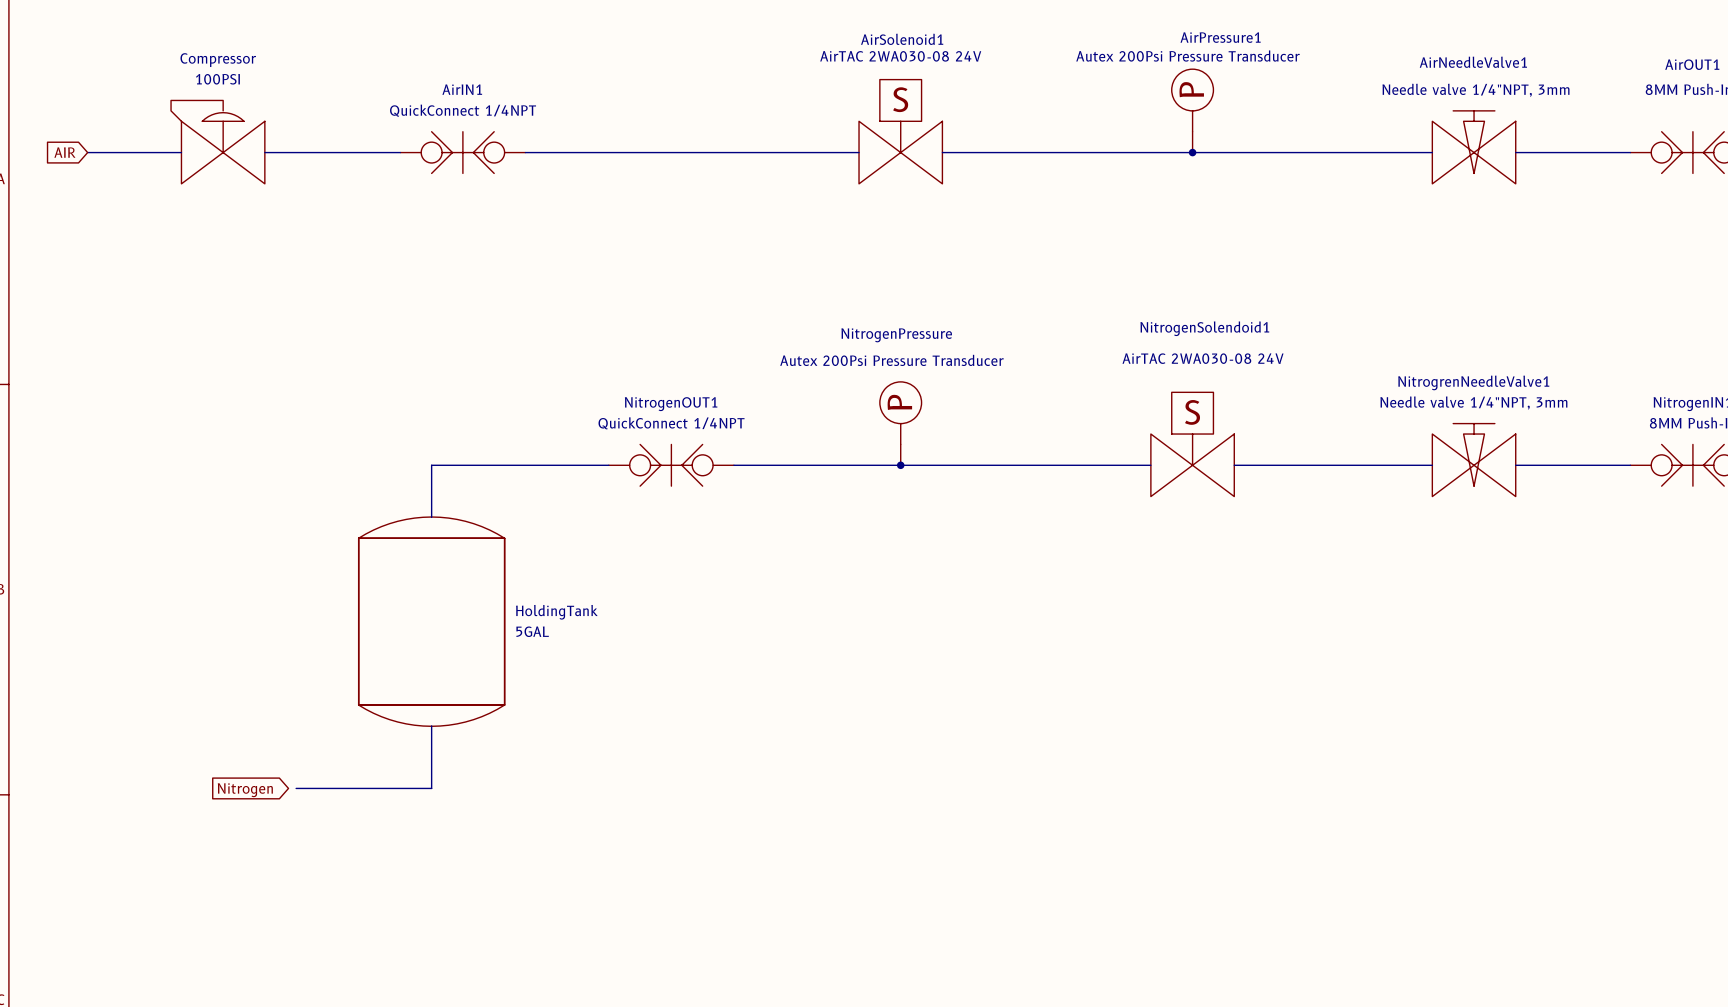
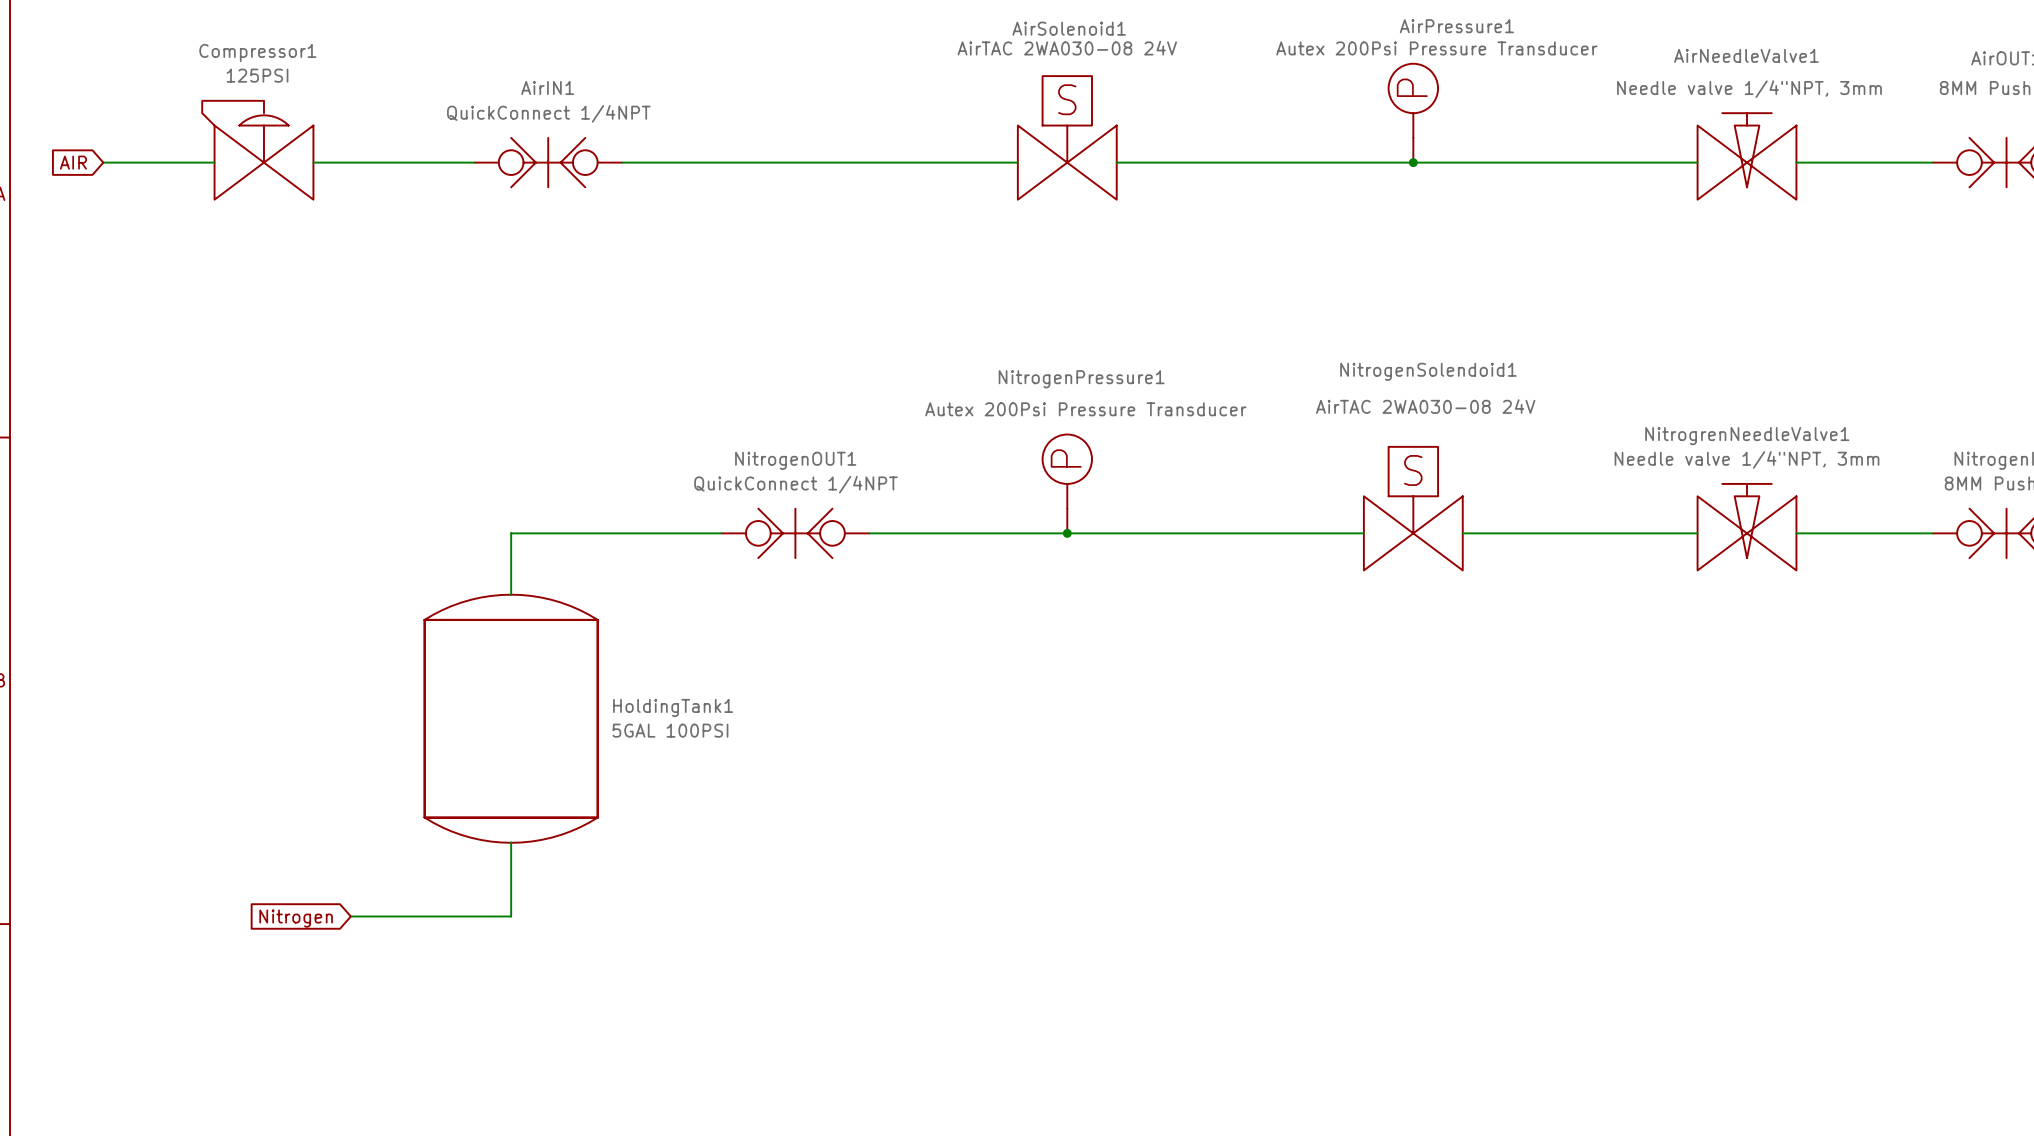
Compressor name: Compressor (218, 60) -> Compressor1 (257, 52)
Compressor value: 100PSI (217, 79) -> 125PSI (257, 75)
NitrogenPressure name: NitrogenPressure (896, 335) -> NitrogenPressure1 (1081, 379)
HoldingTank name: HoldingTank (556, 612) -> HoldingTank1 (673, 707)
HoldingTank value: 5GAL (532, 631) -> 5GAL 100PSI (670, 730)

